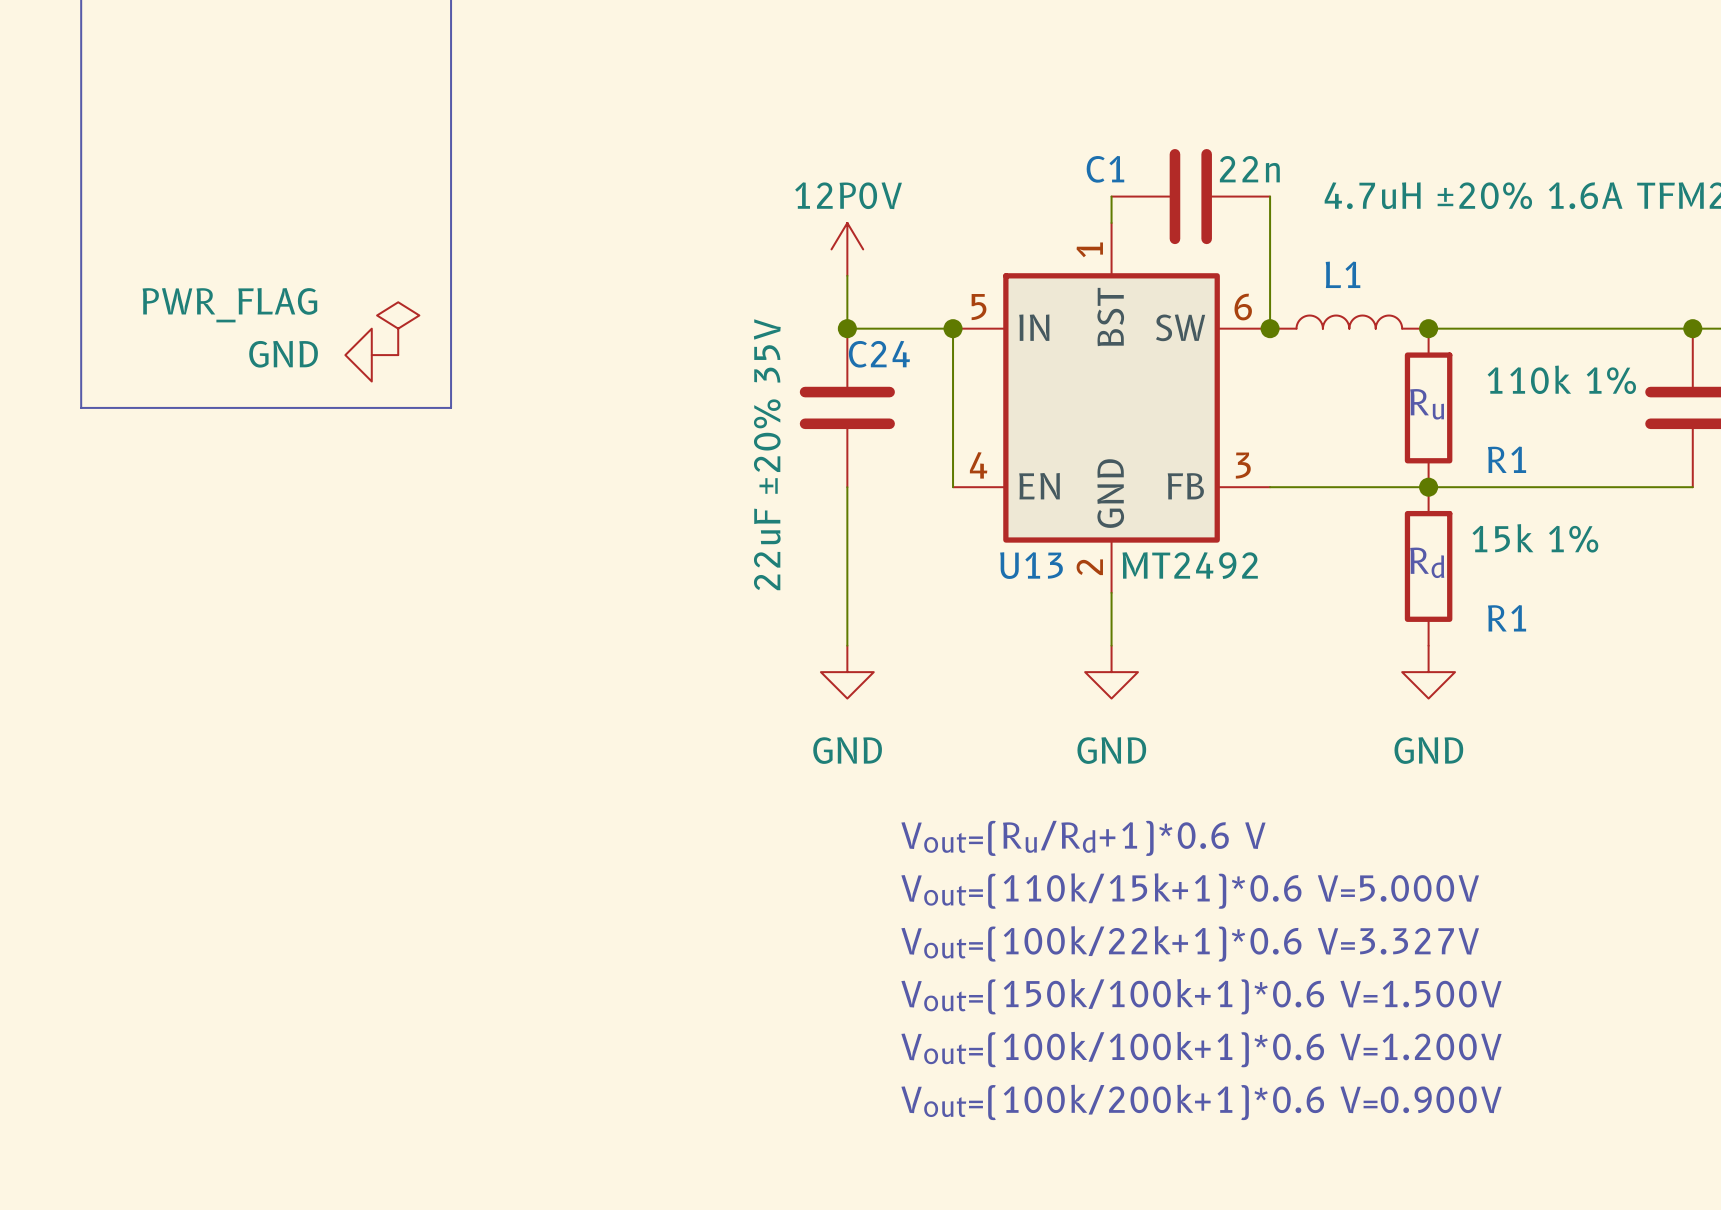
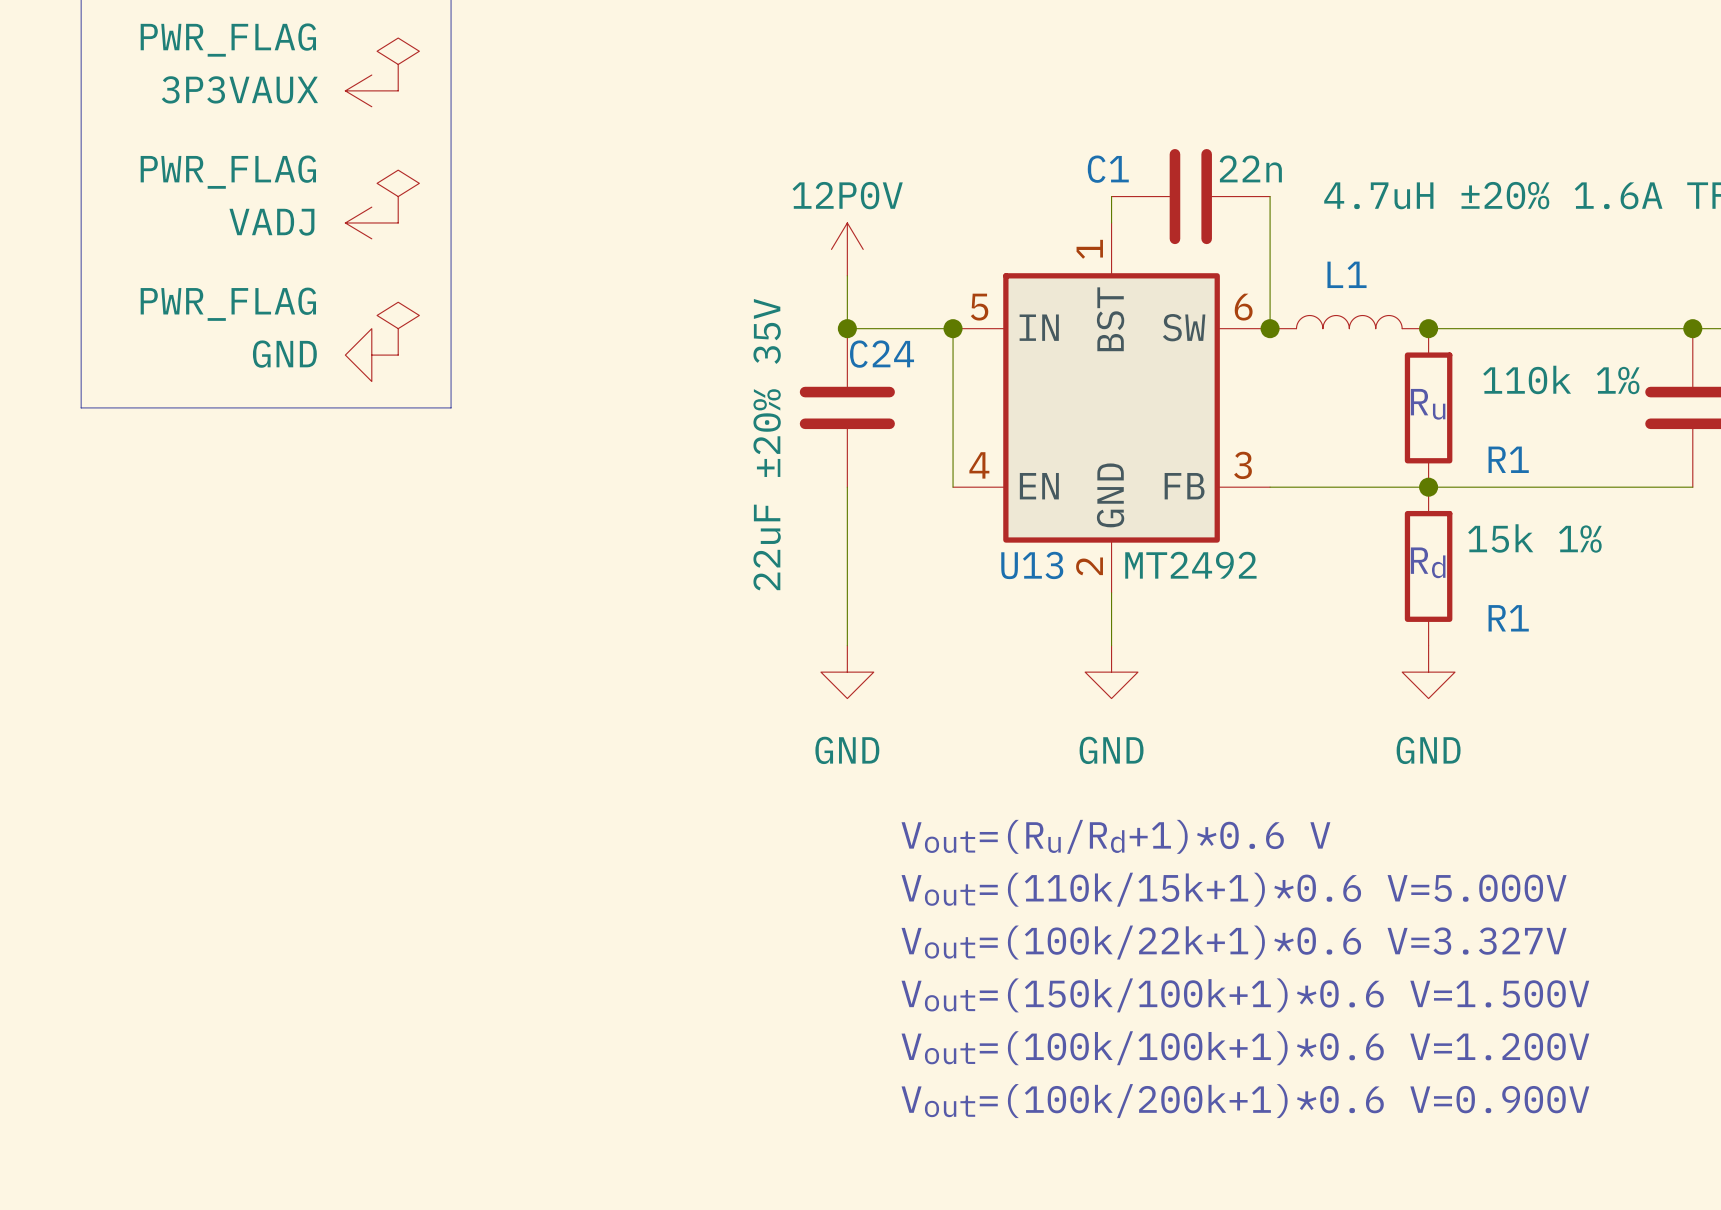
power symbol: none -> PWR_FLAG (398, 64)
power symbol: none -> 3P3VAUX (371, 90)
power symbol: none -> PWR_FLAG (398, 196)
power symbol: none -> VADJ (371, 222)

